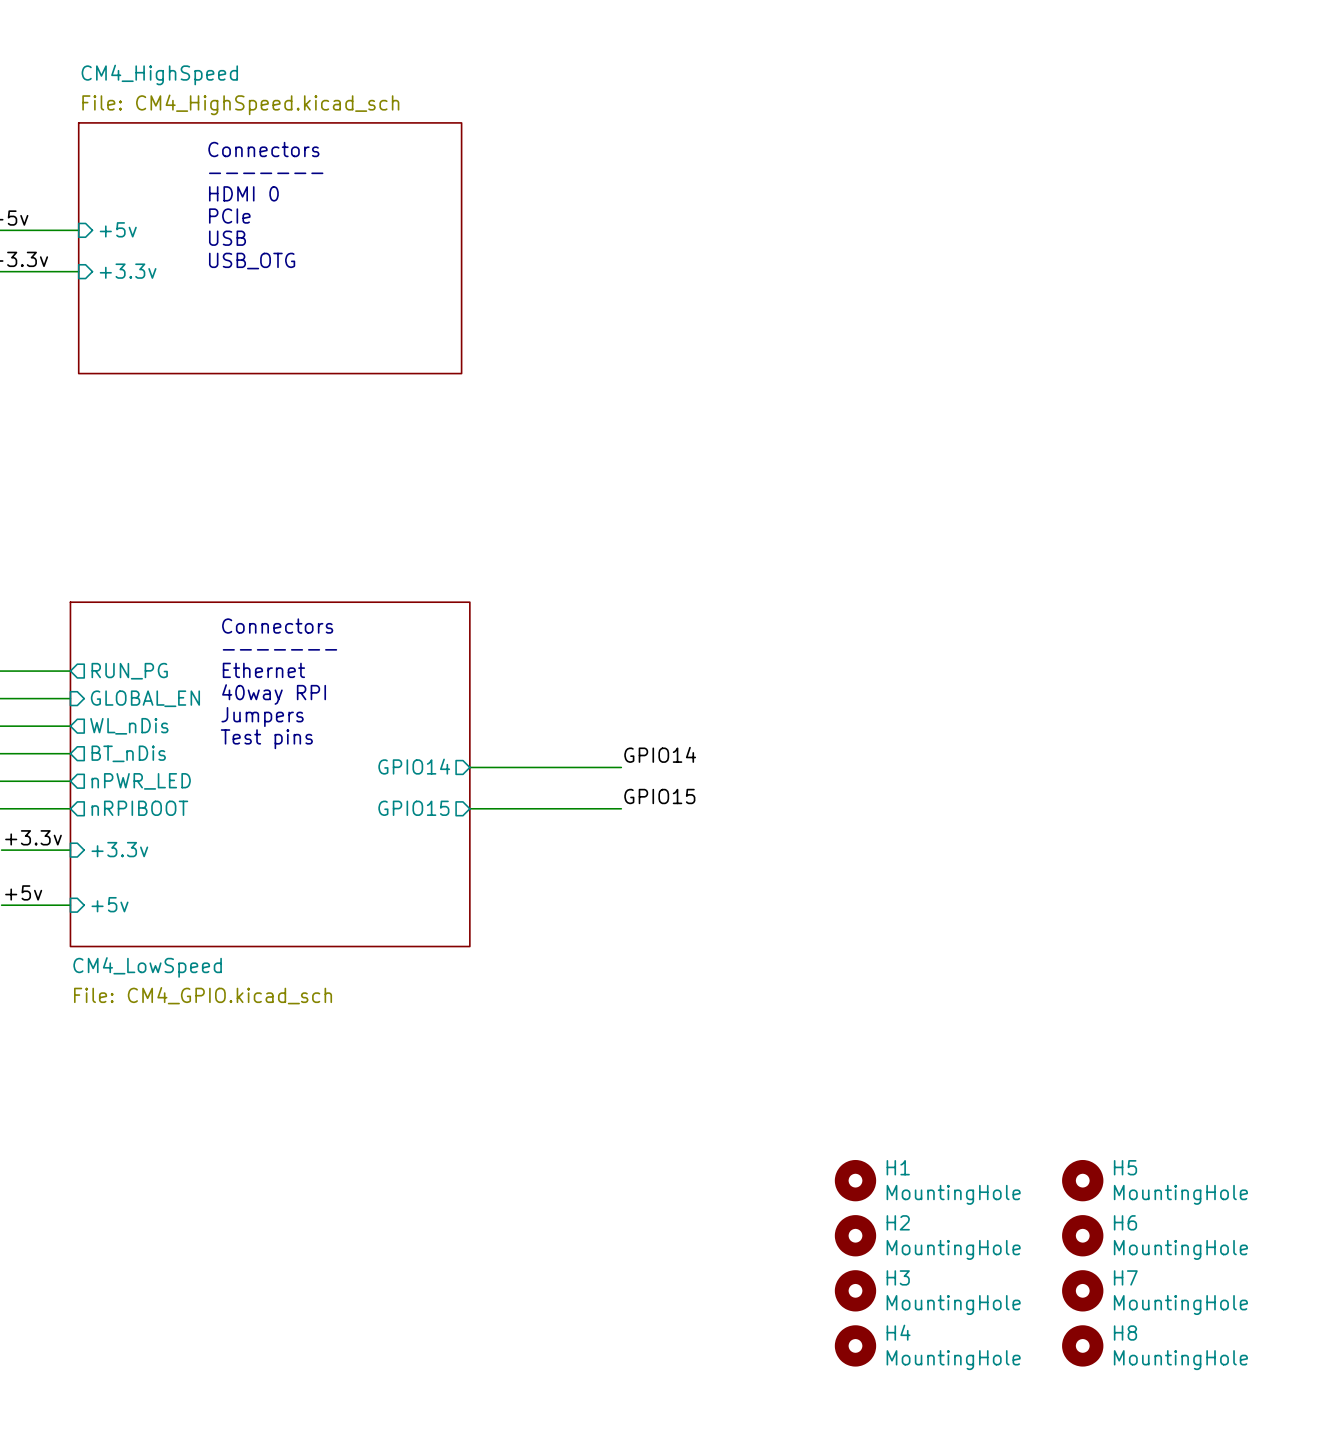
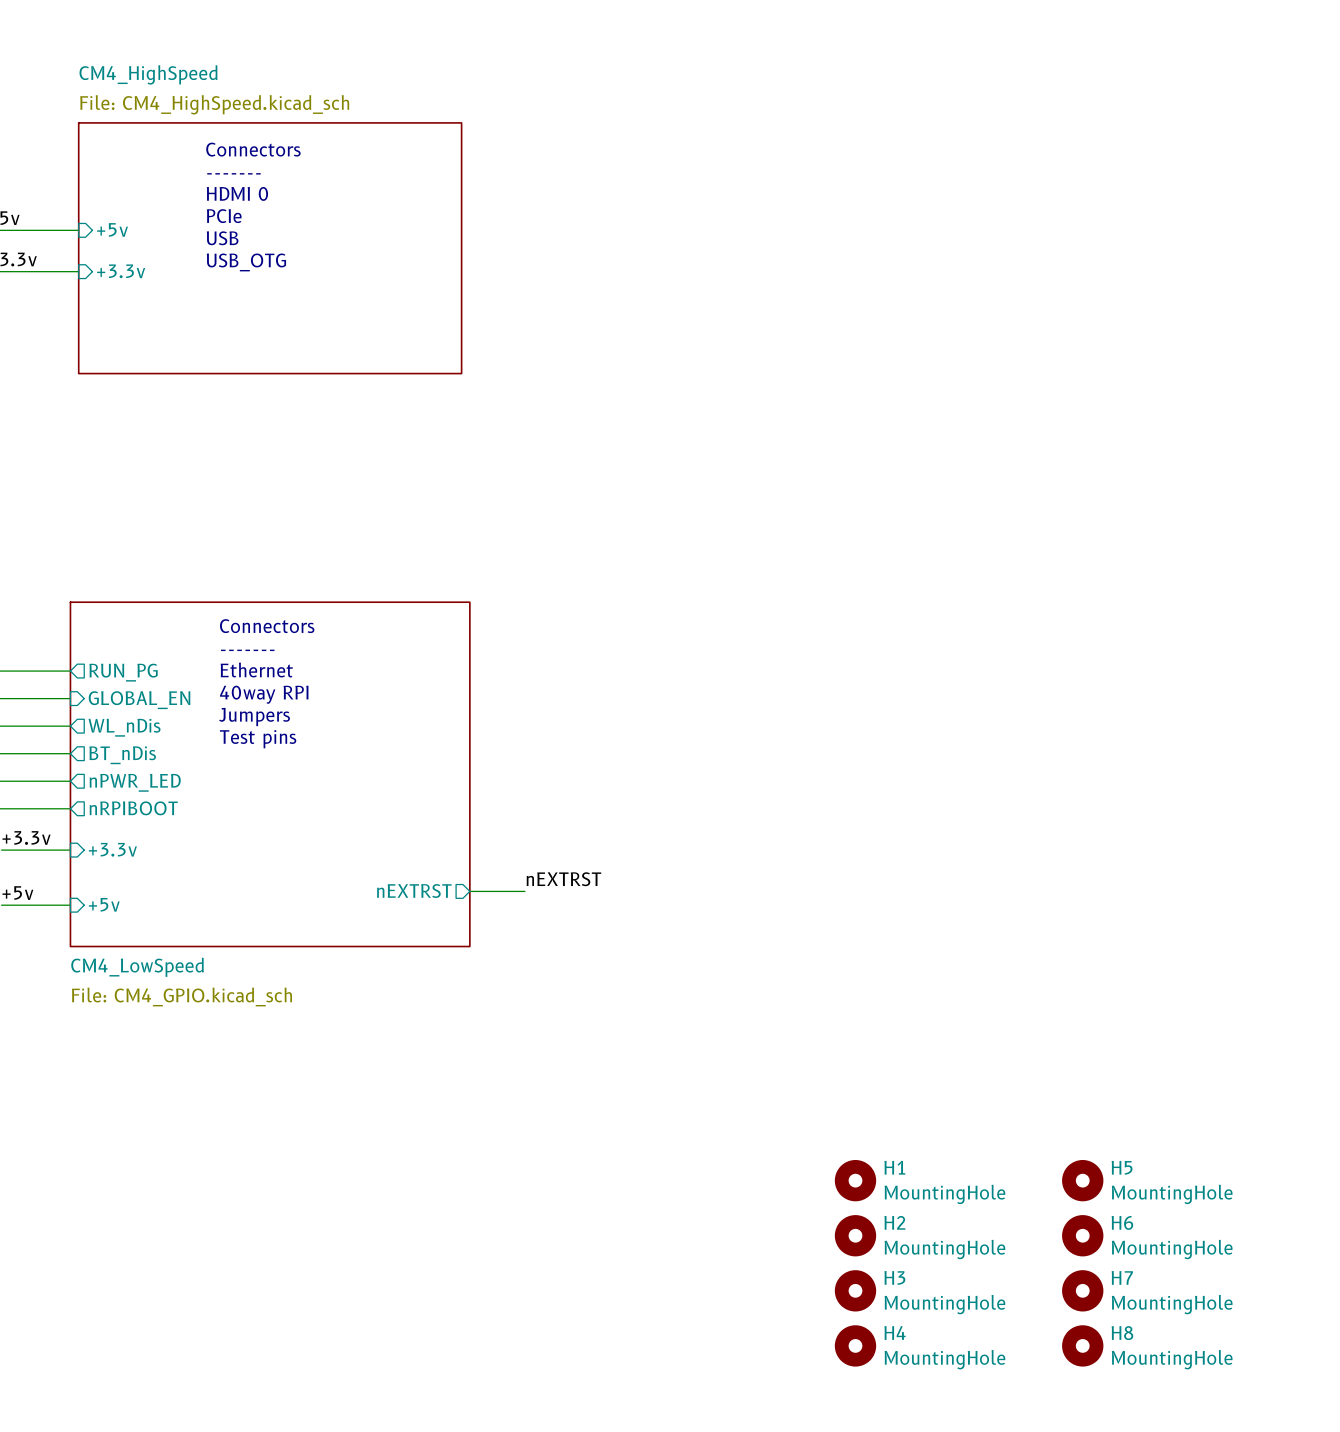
label: GPIO14 (660, 754) -> none
sheet pin: GPIO14 (414, 766) -> none
wire: (469, 767) (621, 767) -> none
label: GPIO15 (659, 796) -> none
sheet pin: GPIO15 (413, 808) -> none
wire: (469, 808) (621, 808) -> none
label: none -> nEXTRST (563, 879)
sheet pin: none -> nEXTRST (414, 890)
wire: none -> (469, 891) (524, 891)

